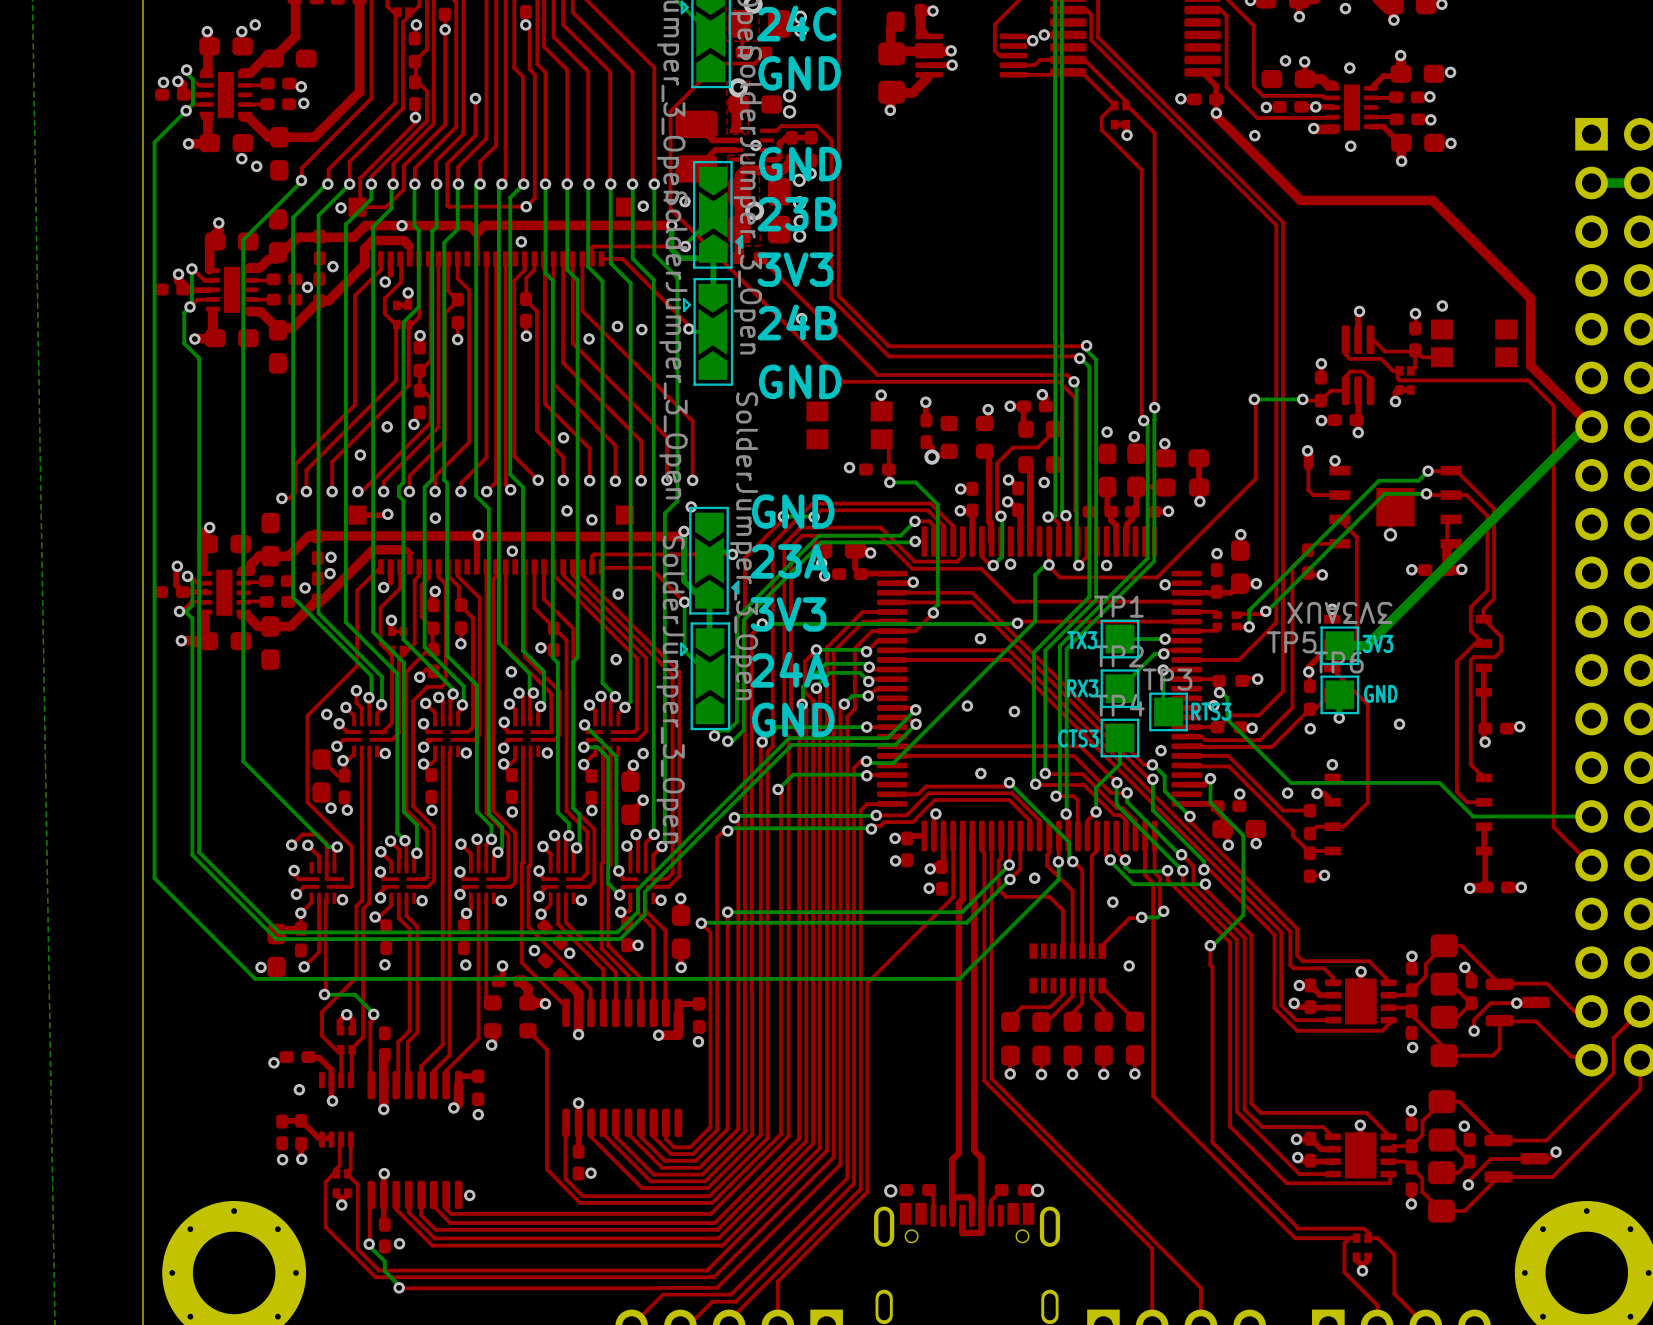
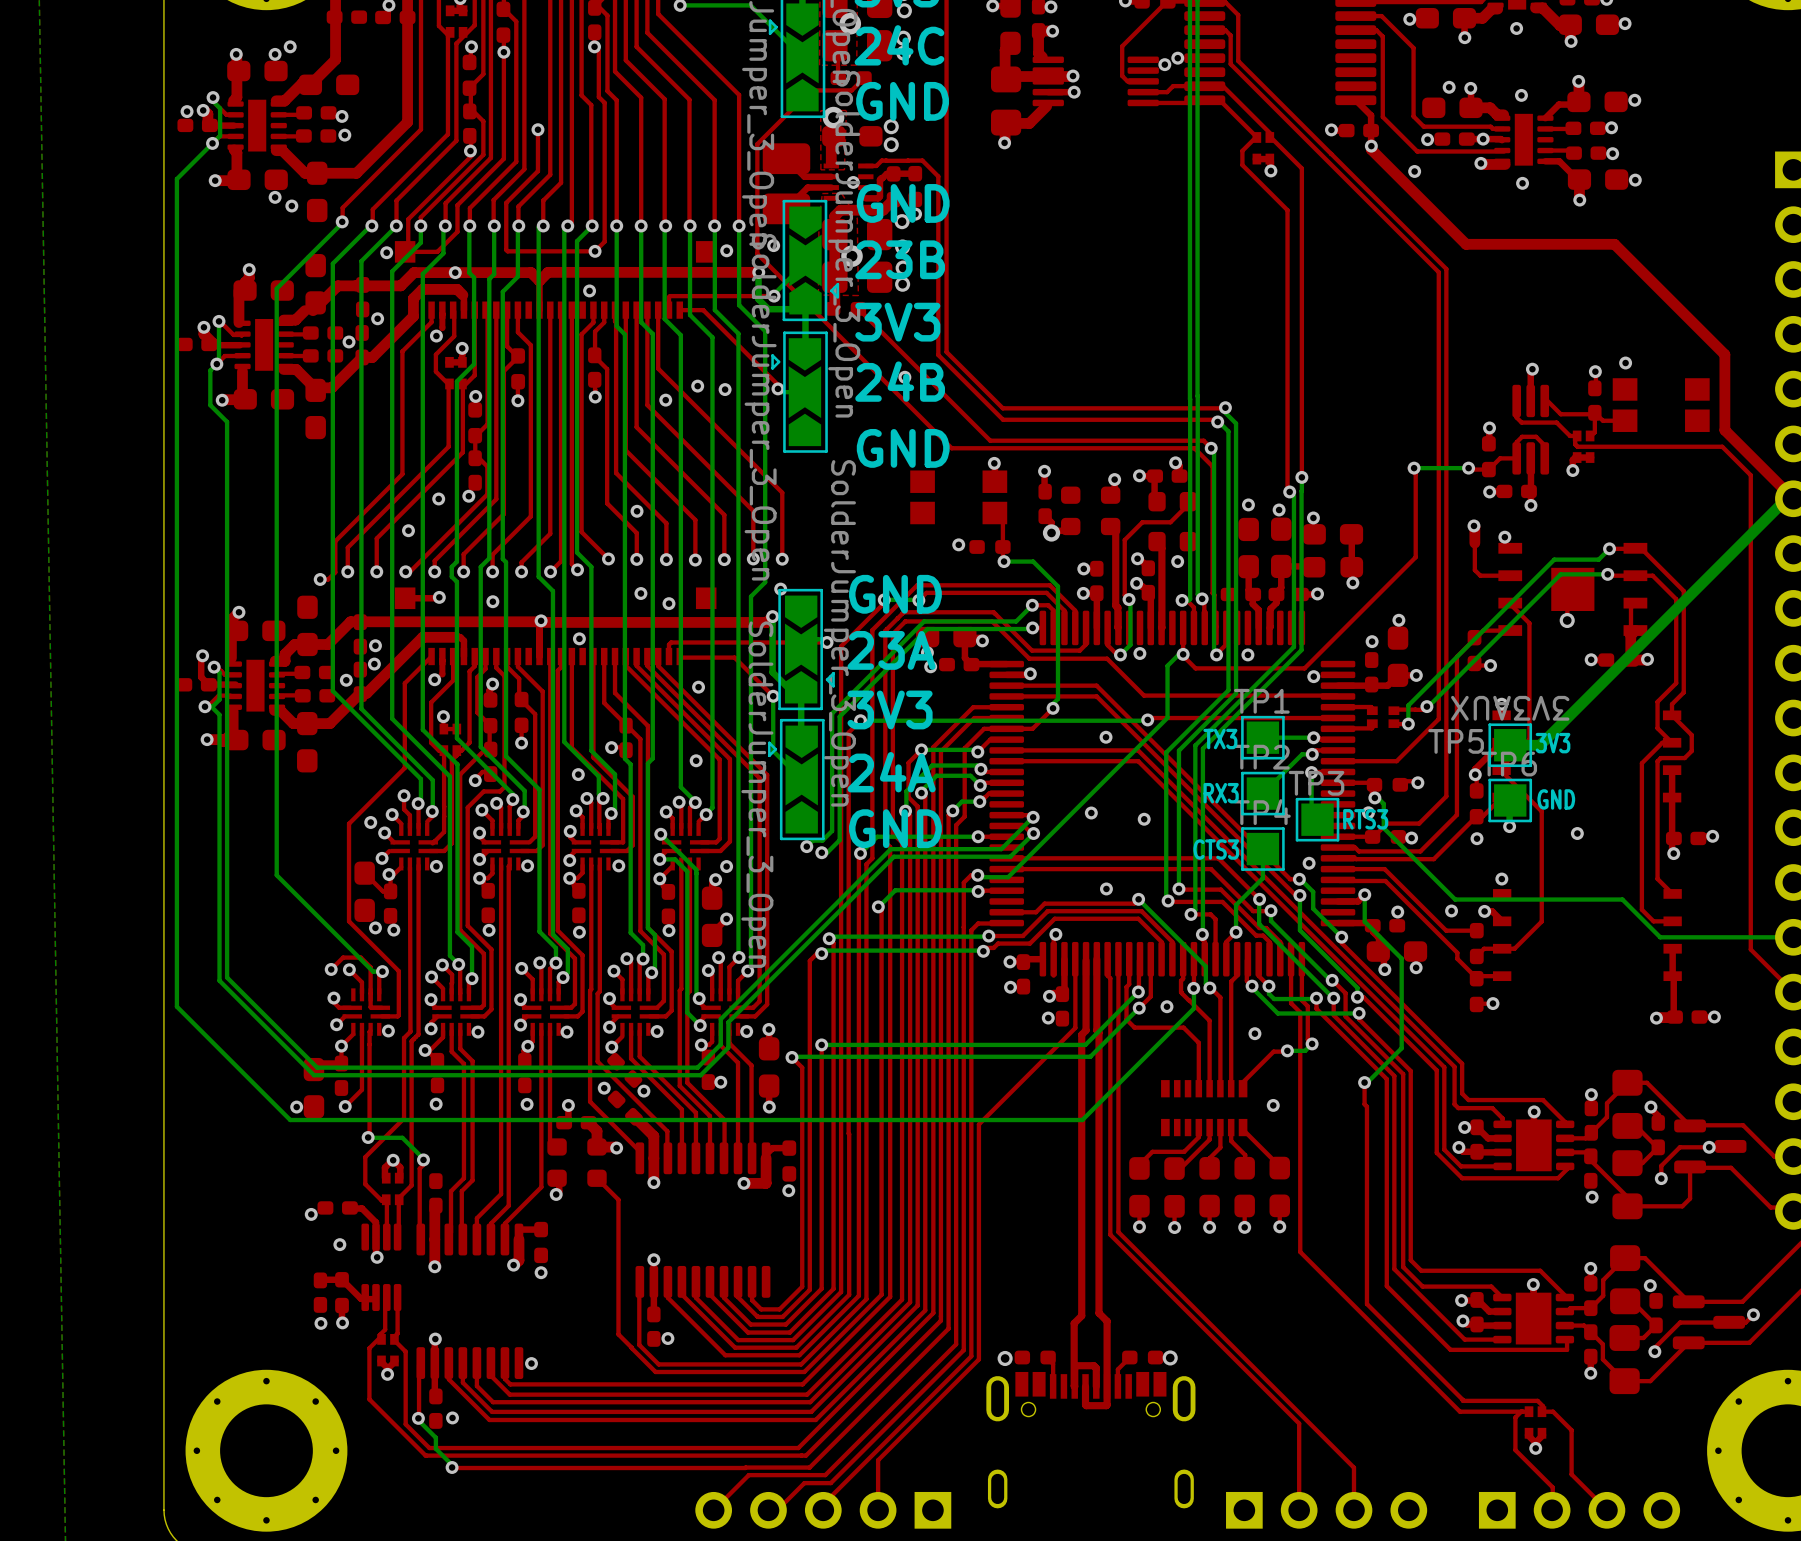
part footprint: [319, 1071, 354, 1148] -> [361, 1223, 402, 1312]

